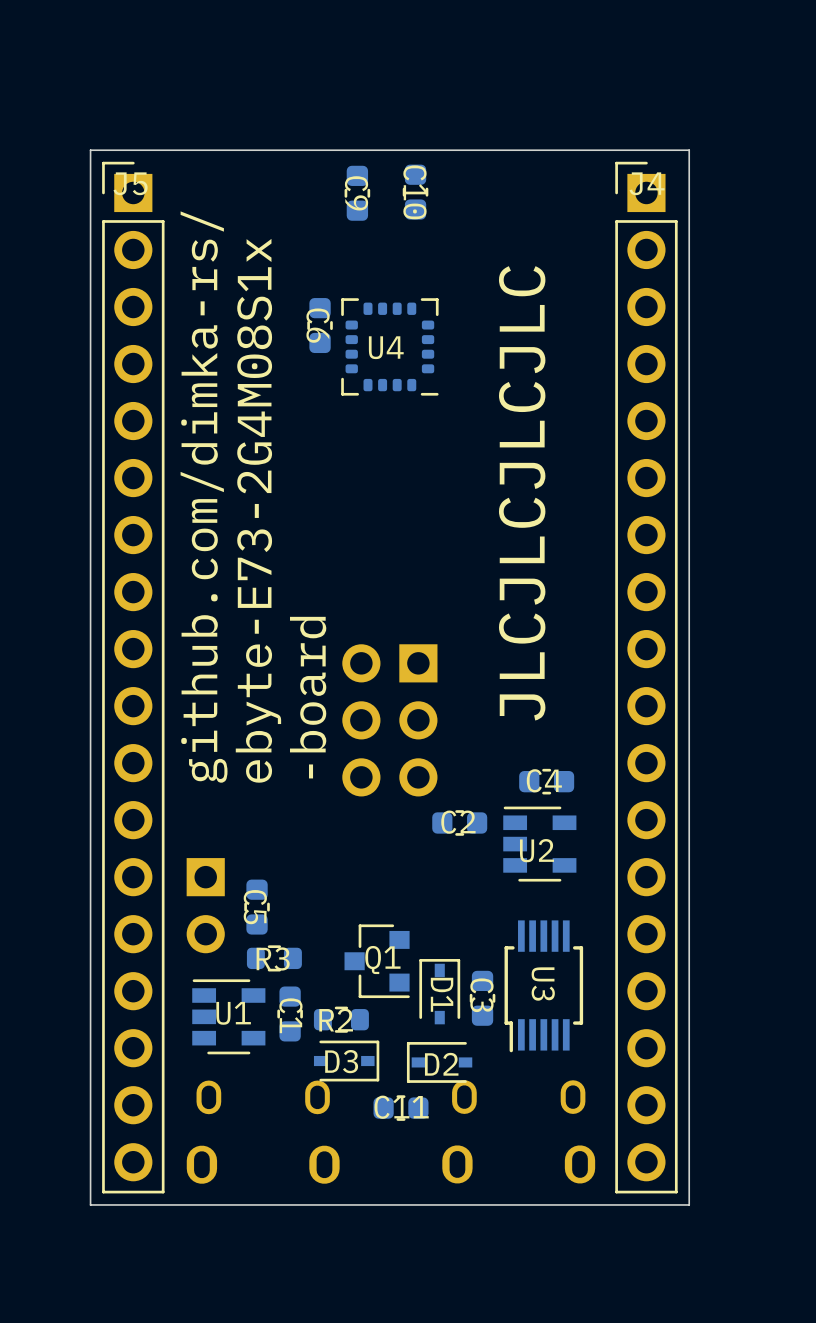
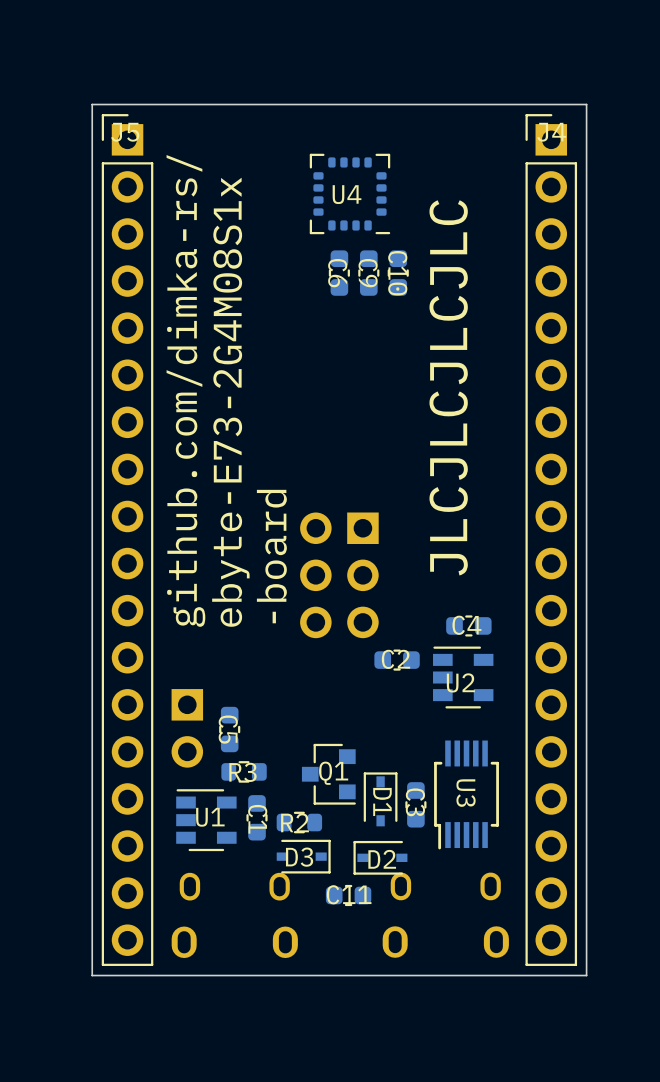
C10 position: (415, 192) -> (398, 273)
C9 position: (357, 193) -> (368, 273)
C6 position: (320, 325) -> (339, 273)
U4 position: (389, 346) -> (349, 193)

